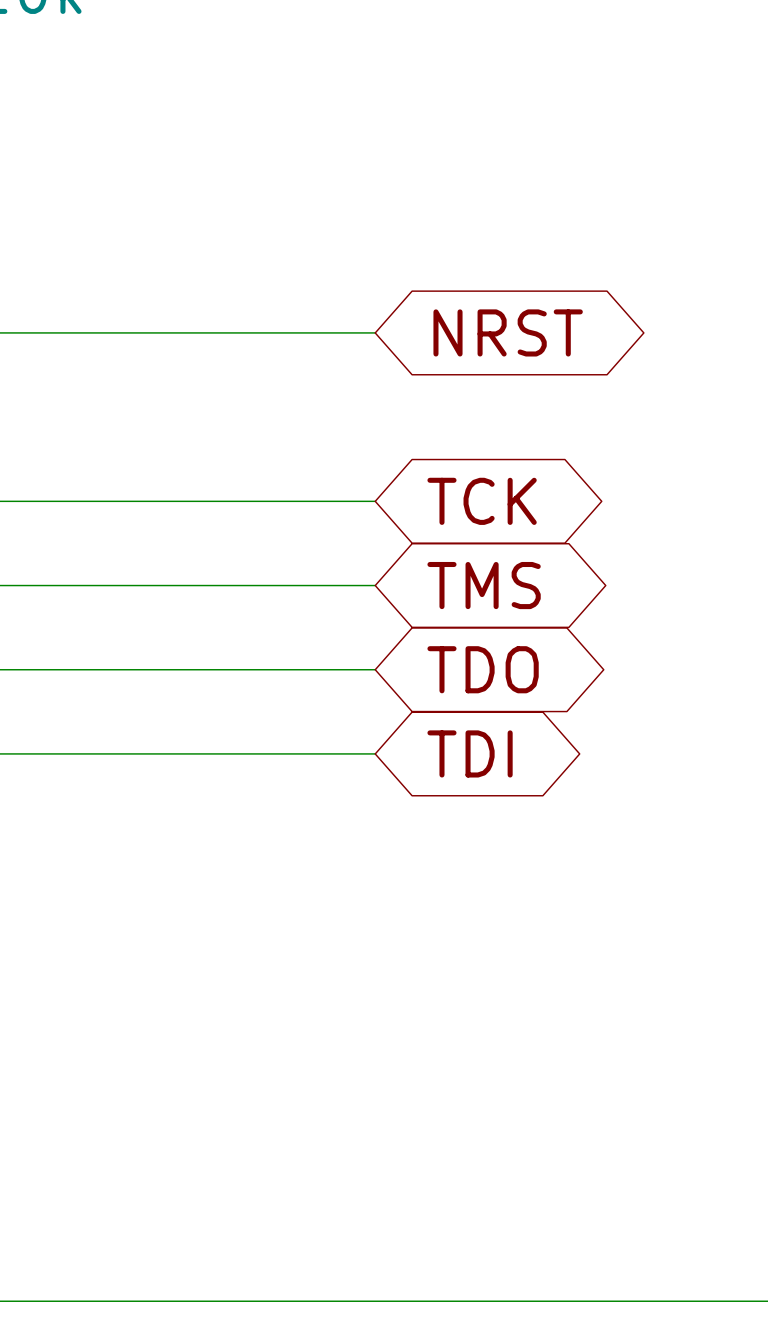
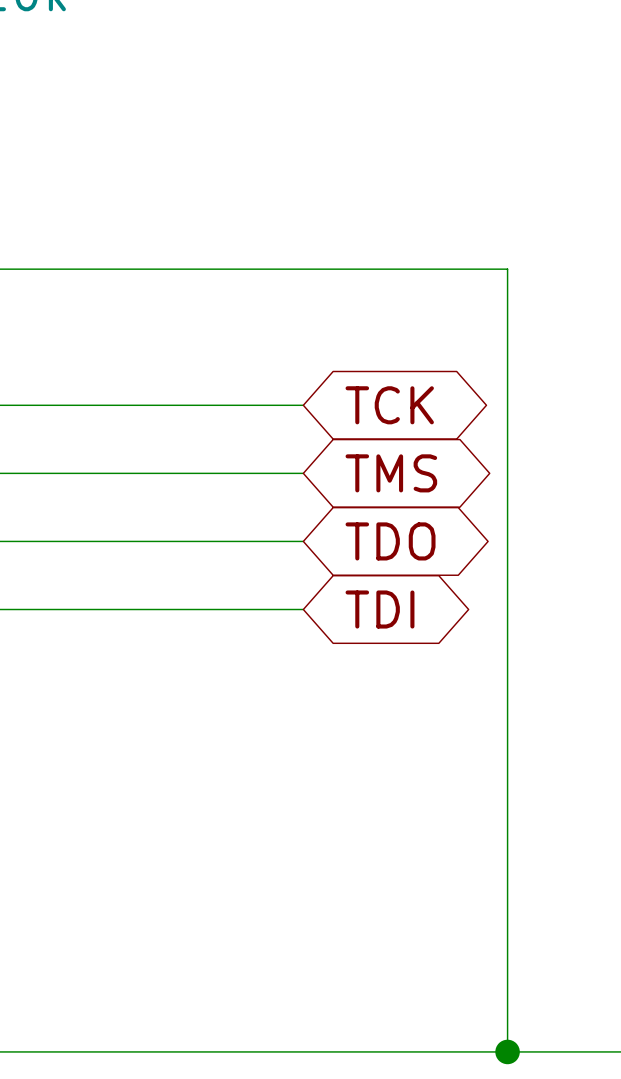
wire: none -> (303, 269) (507, 269) (507, 1051)
global label: NRST (508, 332) -> none
junction: none -> (507, 1051)

